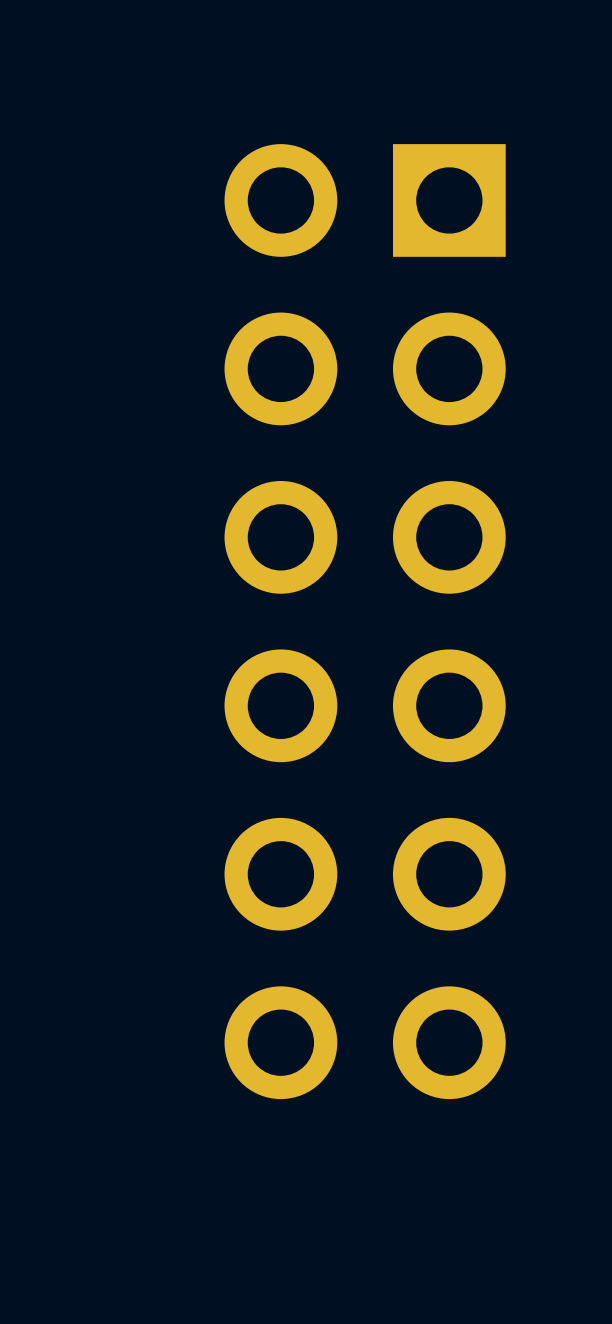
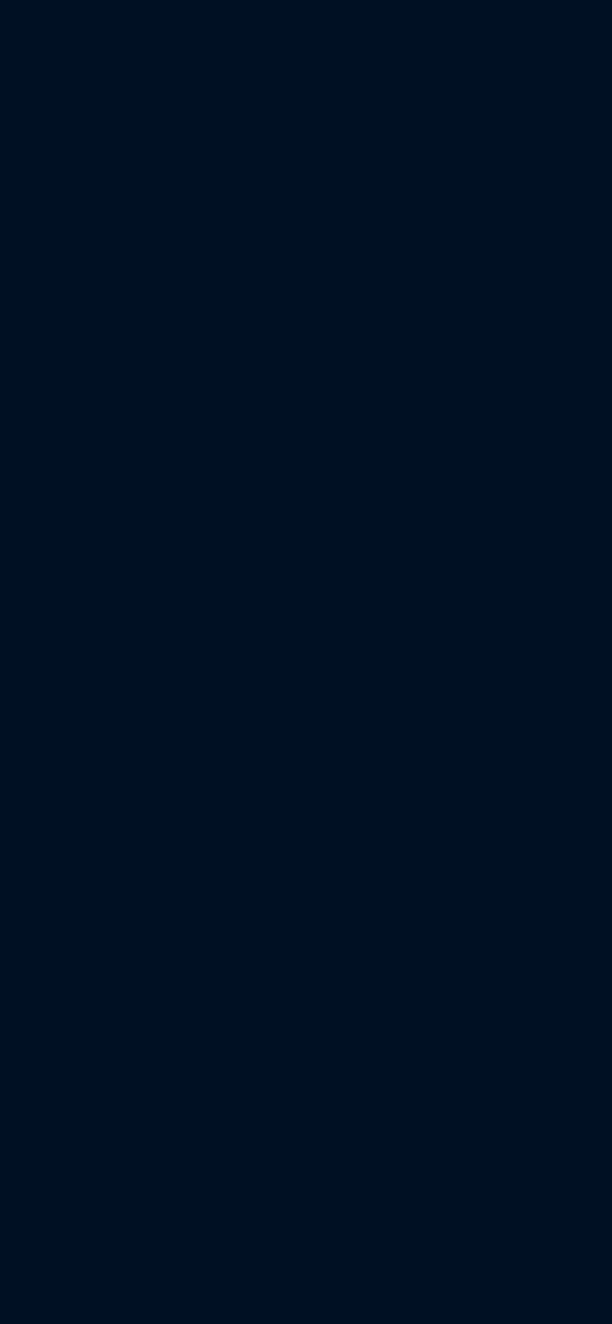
part: (365, 621) -> none

